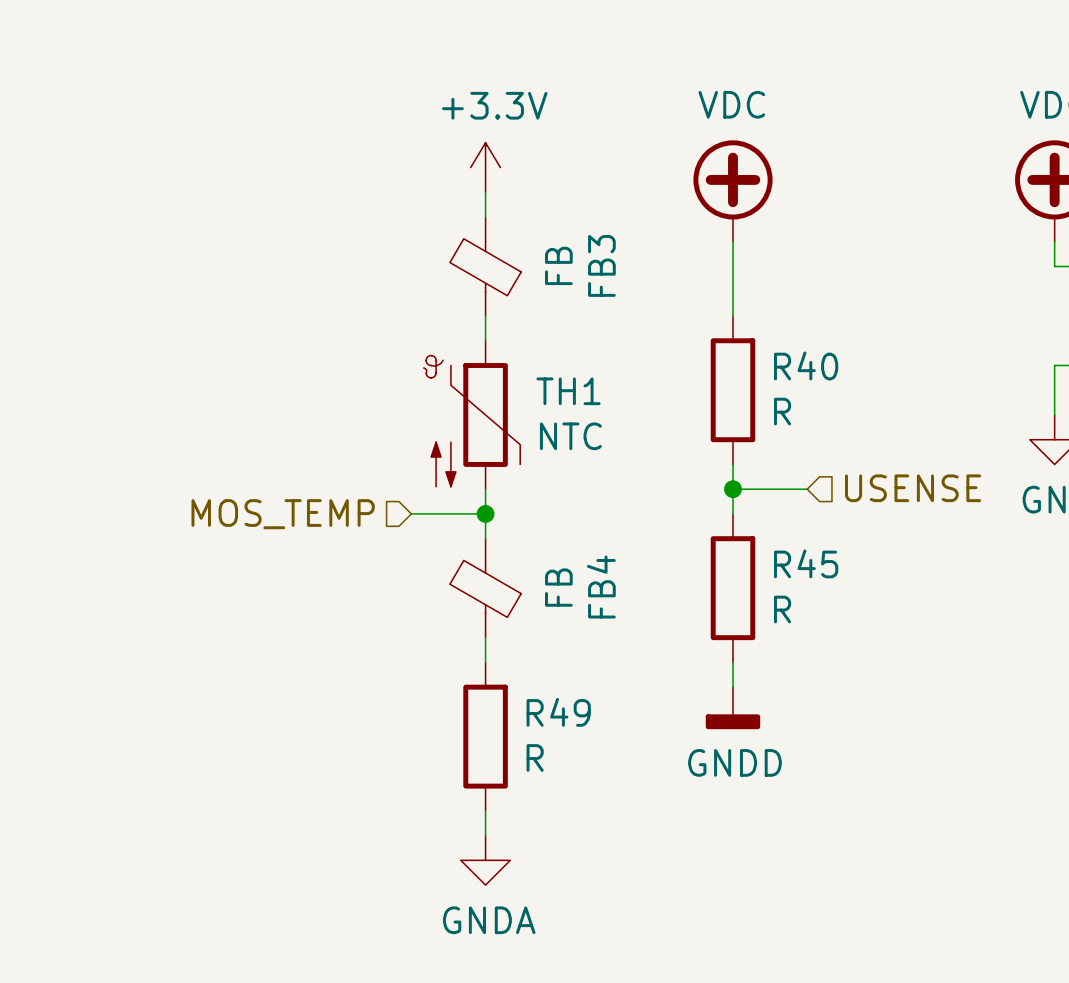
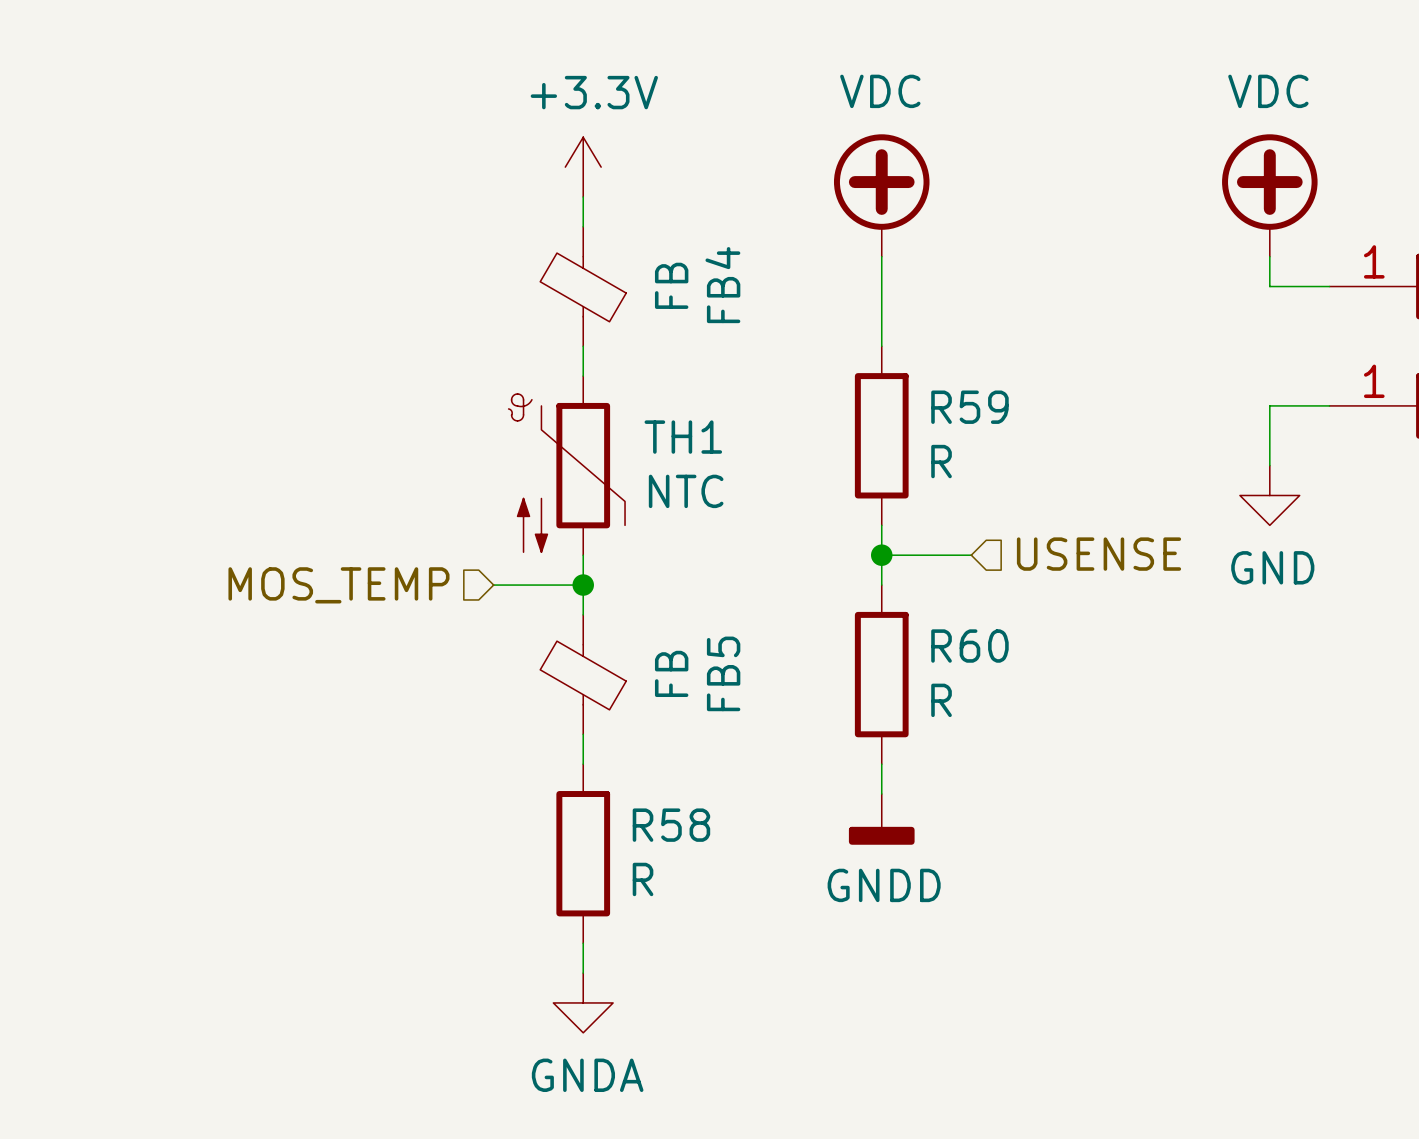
FB3 name: FB3 (601, 265) -> FB4 (722, 285)
R40 name: R40 (806, 365) -> R59 (969, 407)
R45 name: R45 (806, 563) -> R60 (969, 646)
FB4 name: FB4 (601, 586) -> FB5 (723, 673)
R49 name: R49 (558, 712) -> R58 (671, 825)

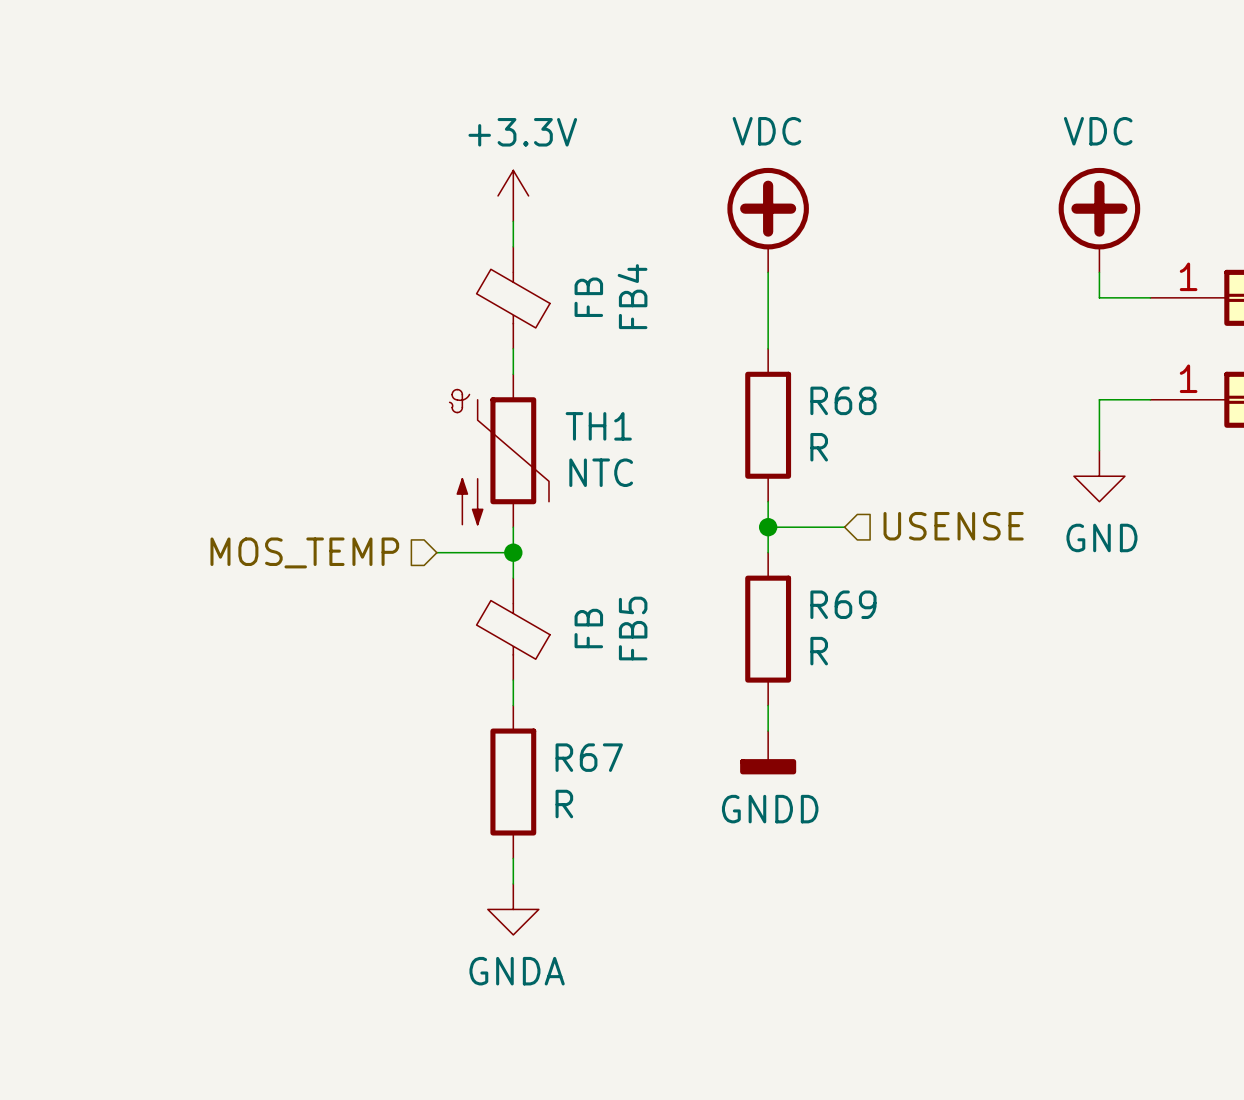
R59 name: R59 (969, 407) -> R68 (843, 400)
R60 name: R60 (969, 646) -> R69 (843, 604)
R58 name: R58 (671, 825) -> R67 (589, 757)

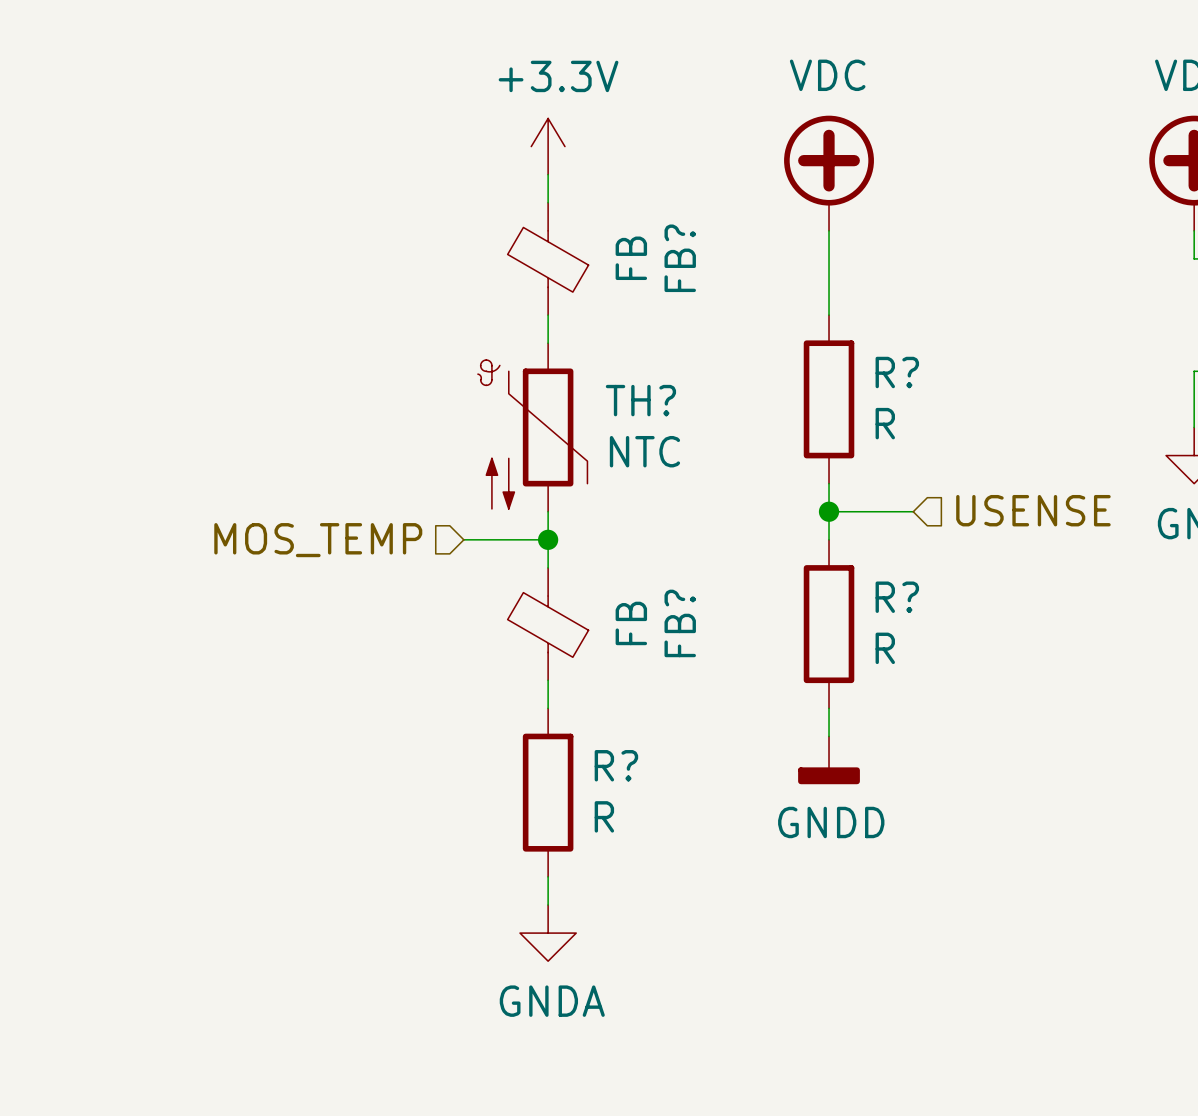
FB4 name: FB4 (632, 296) -> FB? (680, 258)
R68 name: R68 (843, 400) -> R? (897, 372)
TH1 name: TH1 (598, 426) -> TH? (640, 400)
R69 name: R69 (843, 604) -> R? (897, 597)
FB5 name: FB5 (633, 628) -> FB? (680, 623)
R67 name: R67 (589, 757) -> R? (616, 765)

